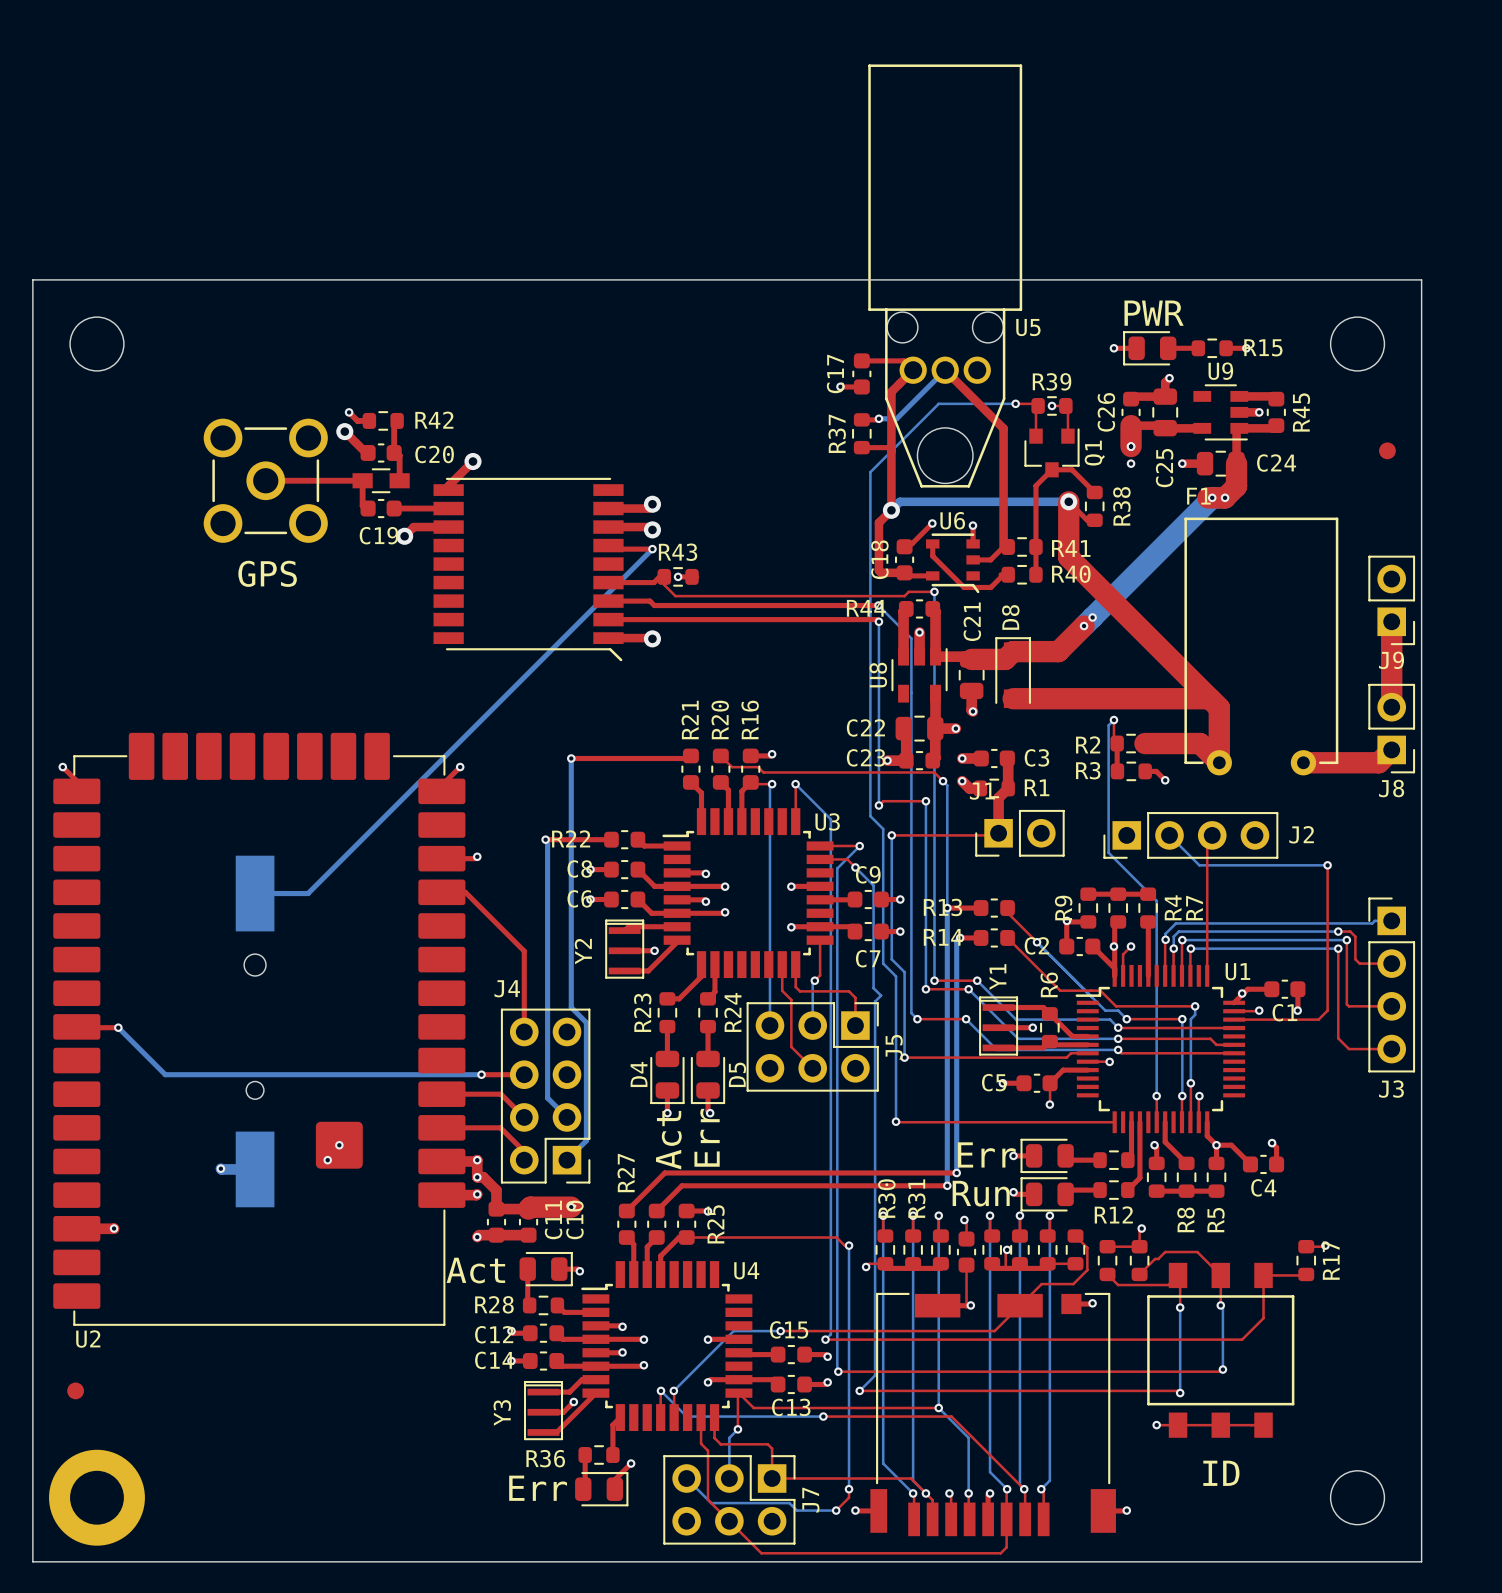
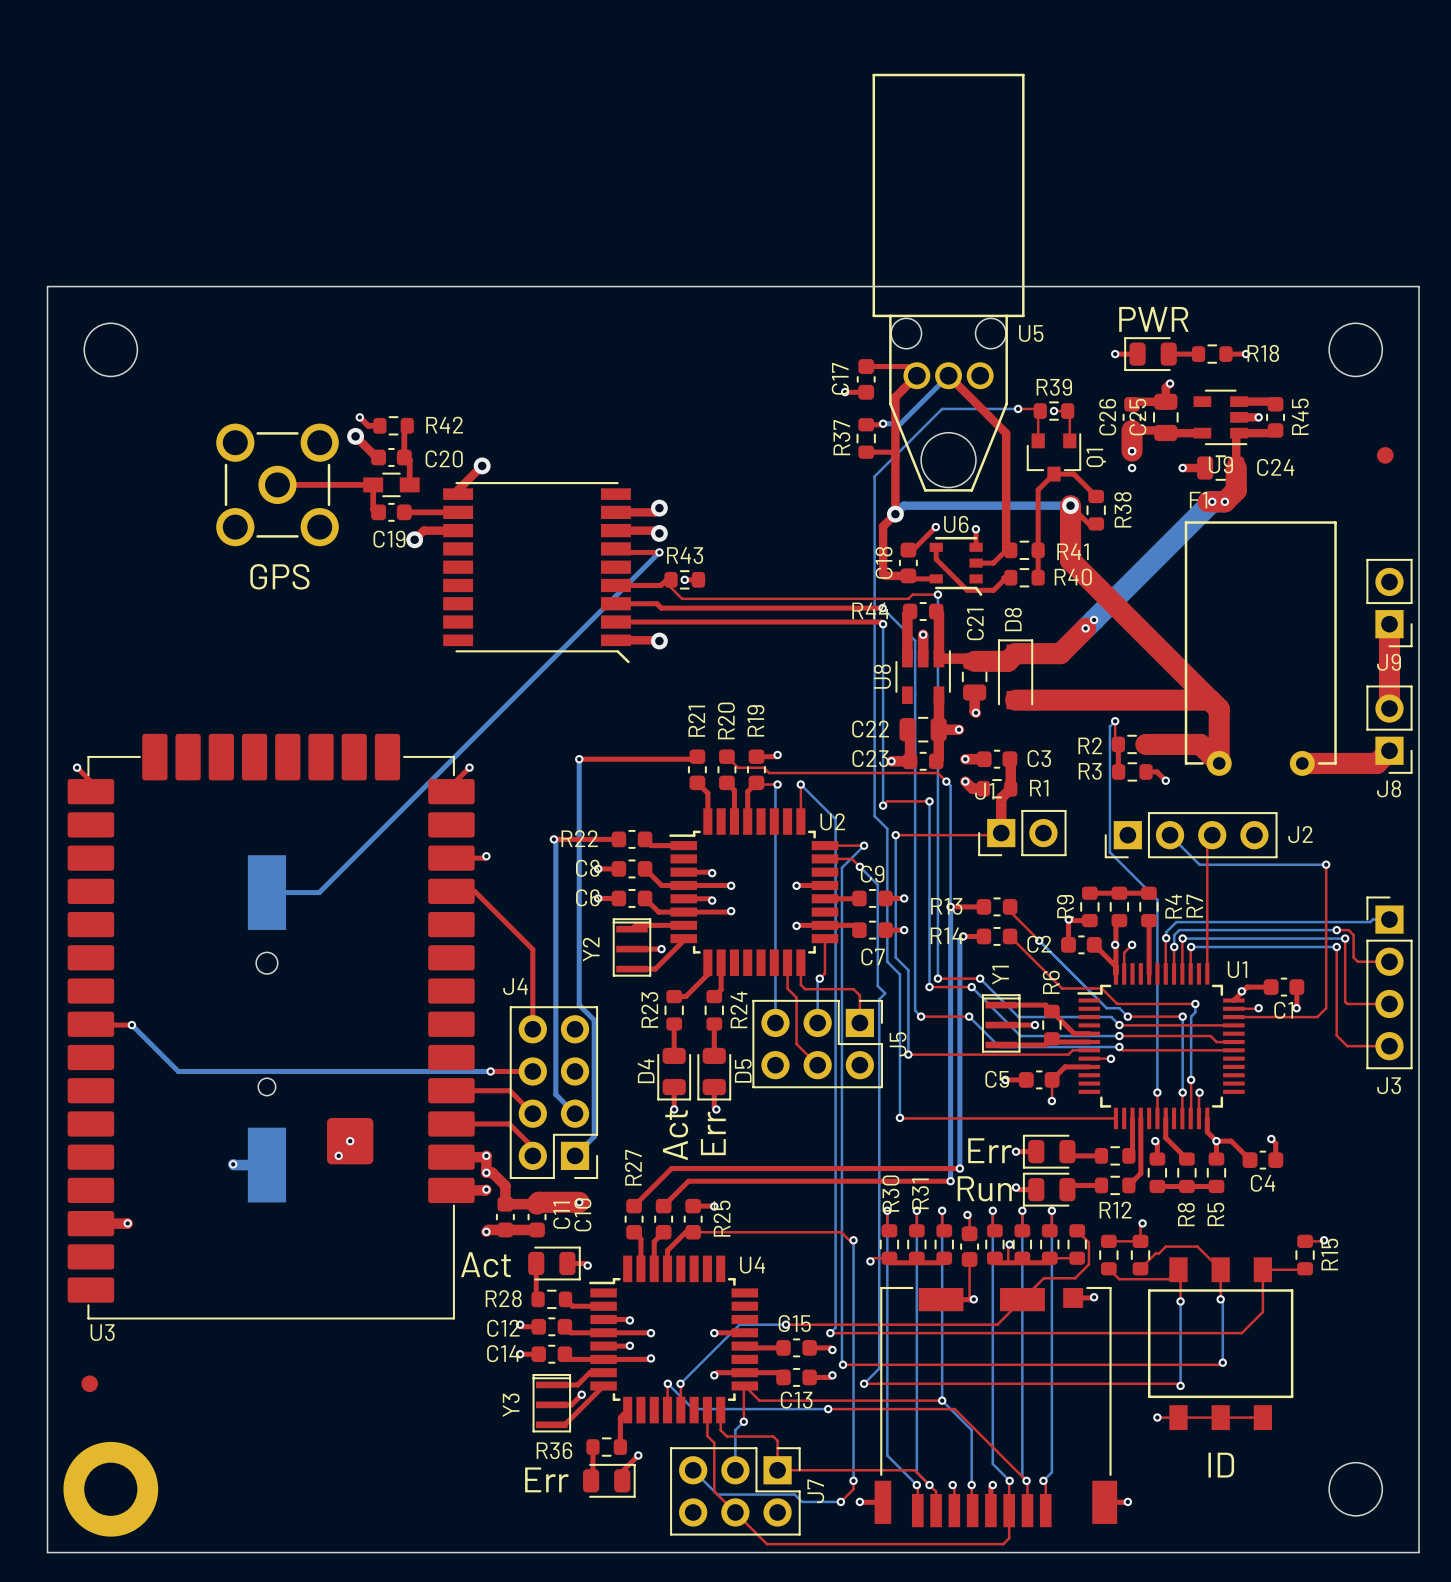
R15 name: R15 (1263, 347) -> R18 (1263, 353)
U9 name position: U9 (1220, 371) -> U9 (1220, 464)
C25 name position: C25 (1164, 468) -> C25 (1137, 417)
R16 name: R16 (750, 719) -> R19 (755, 720)
U3 name: U3 (827, 821) -> U2 (832, 821)
R17 name: R17 (1331, 1260) -> R15 (1329, 1254)
U2 name: U2 (88, 1339) -> U3 (102, 1332)

